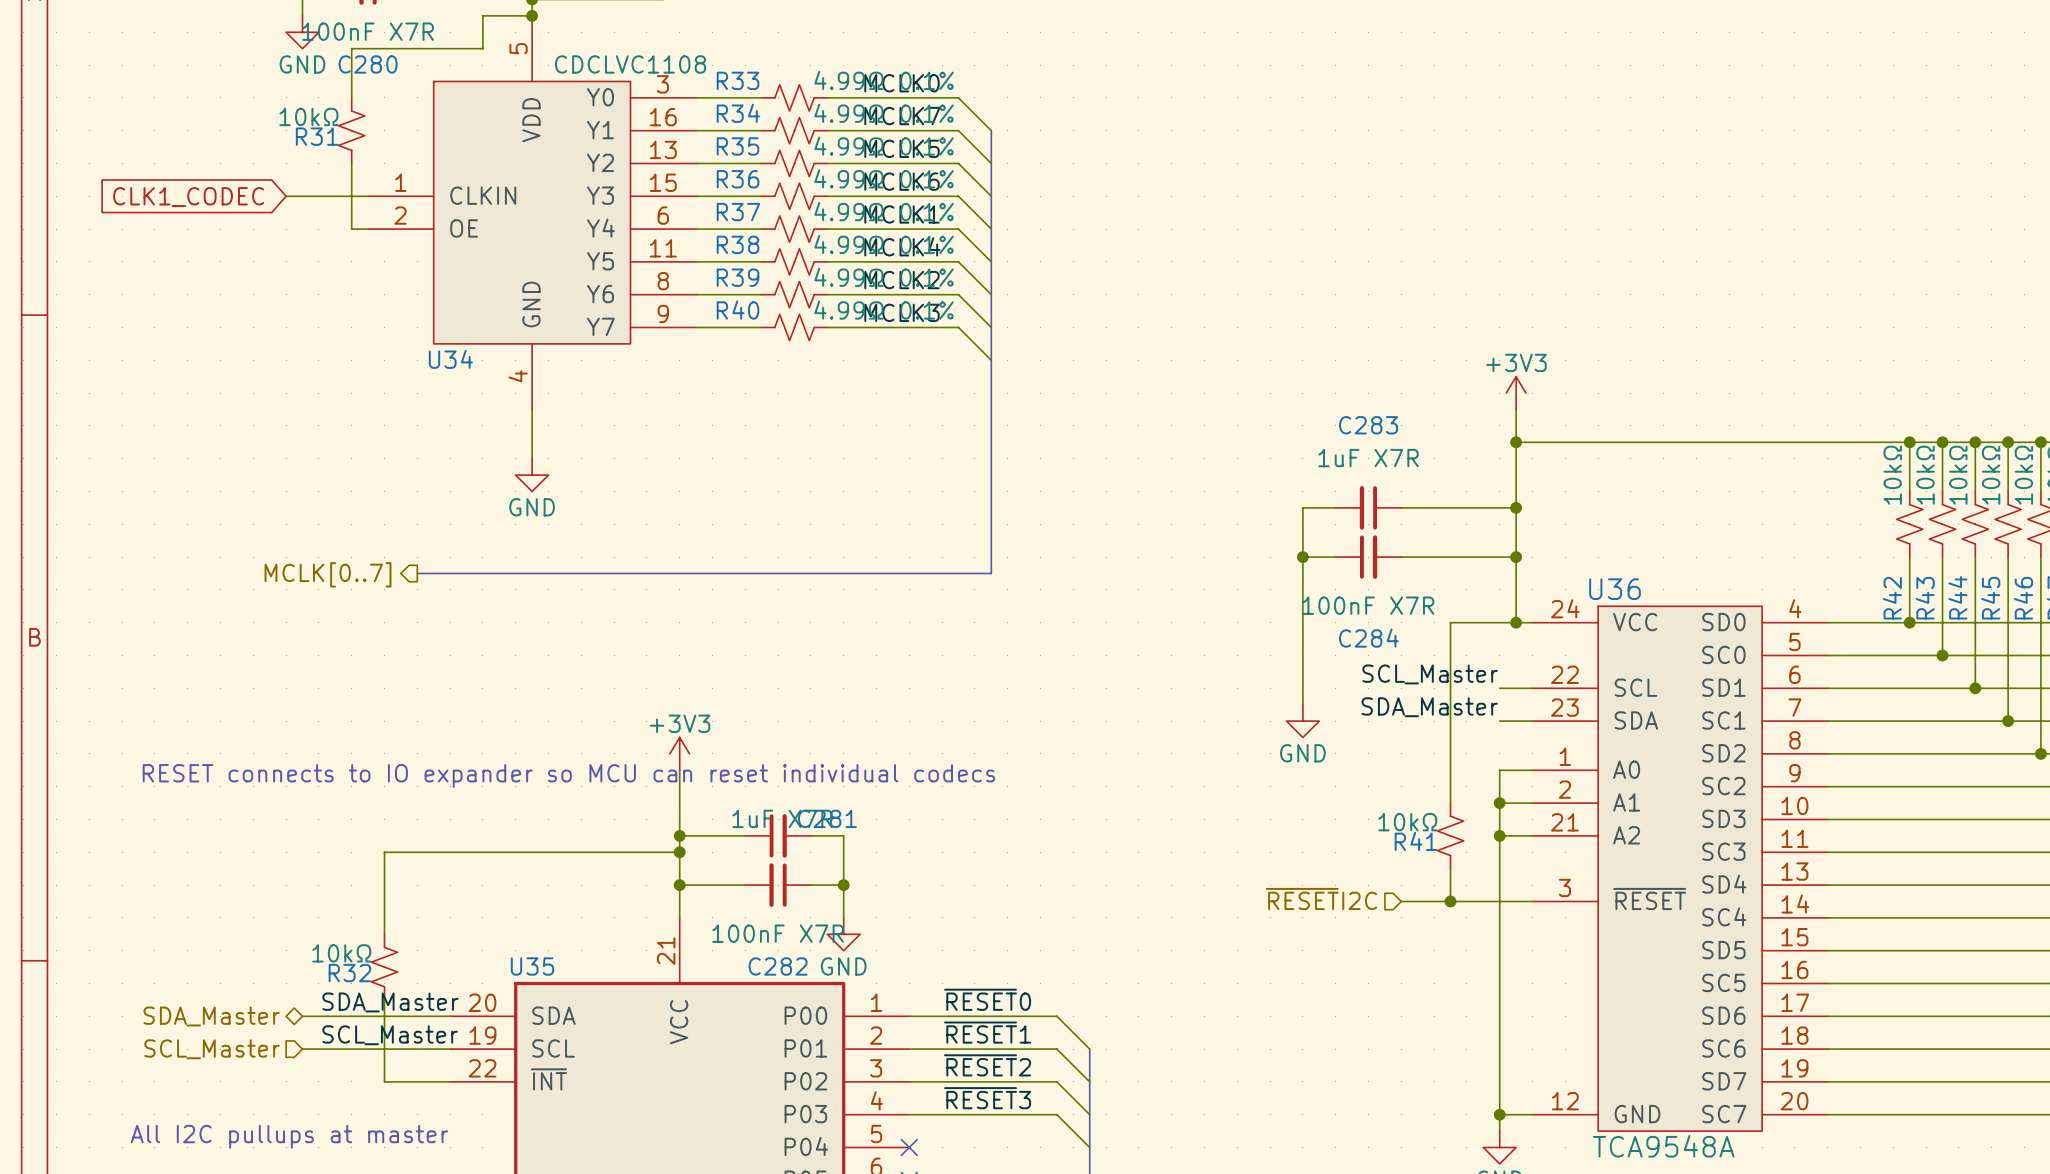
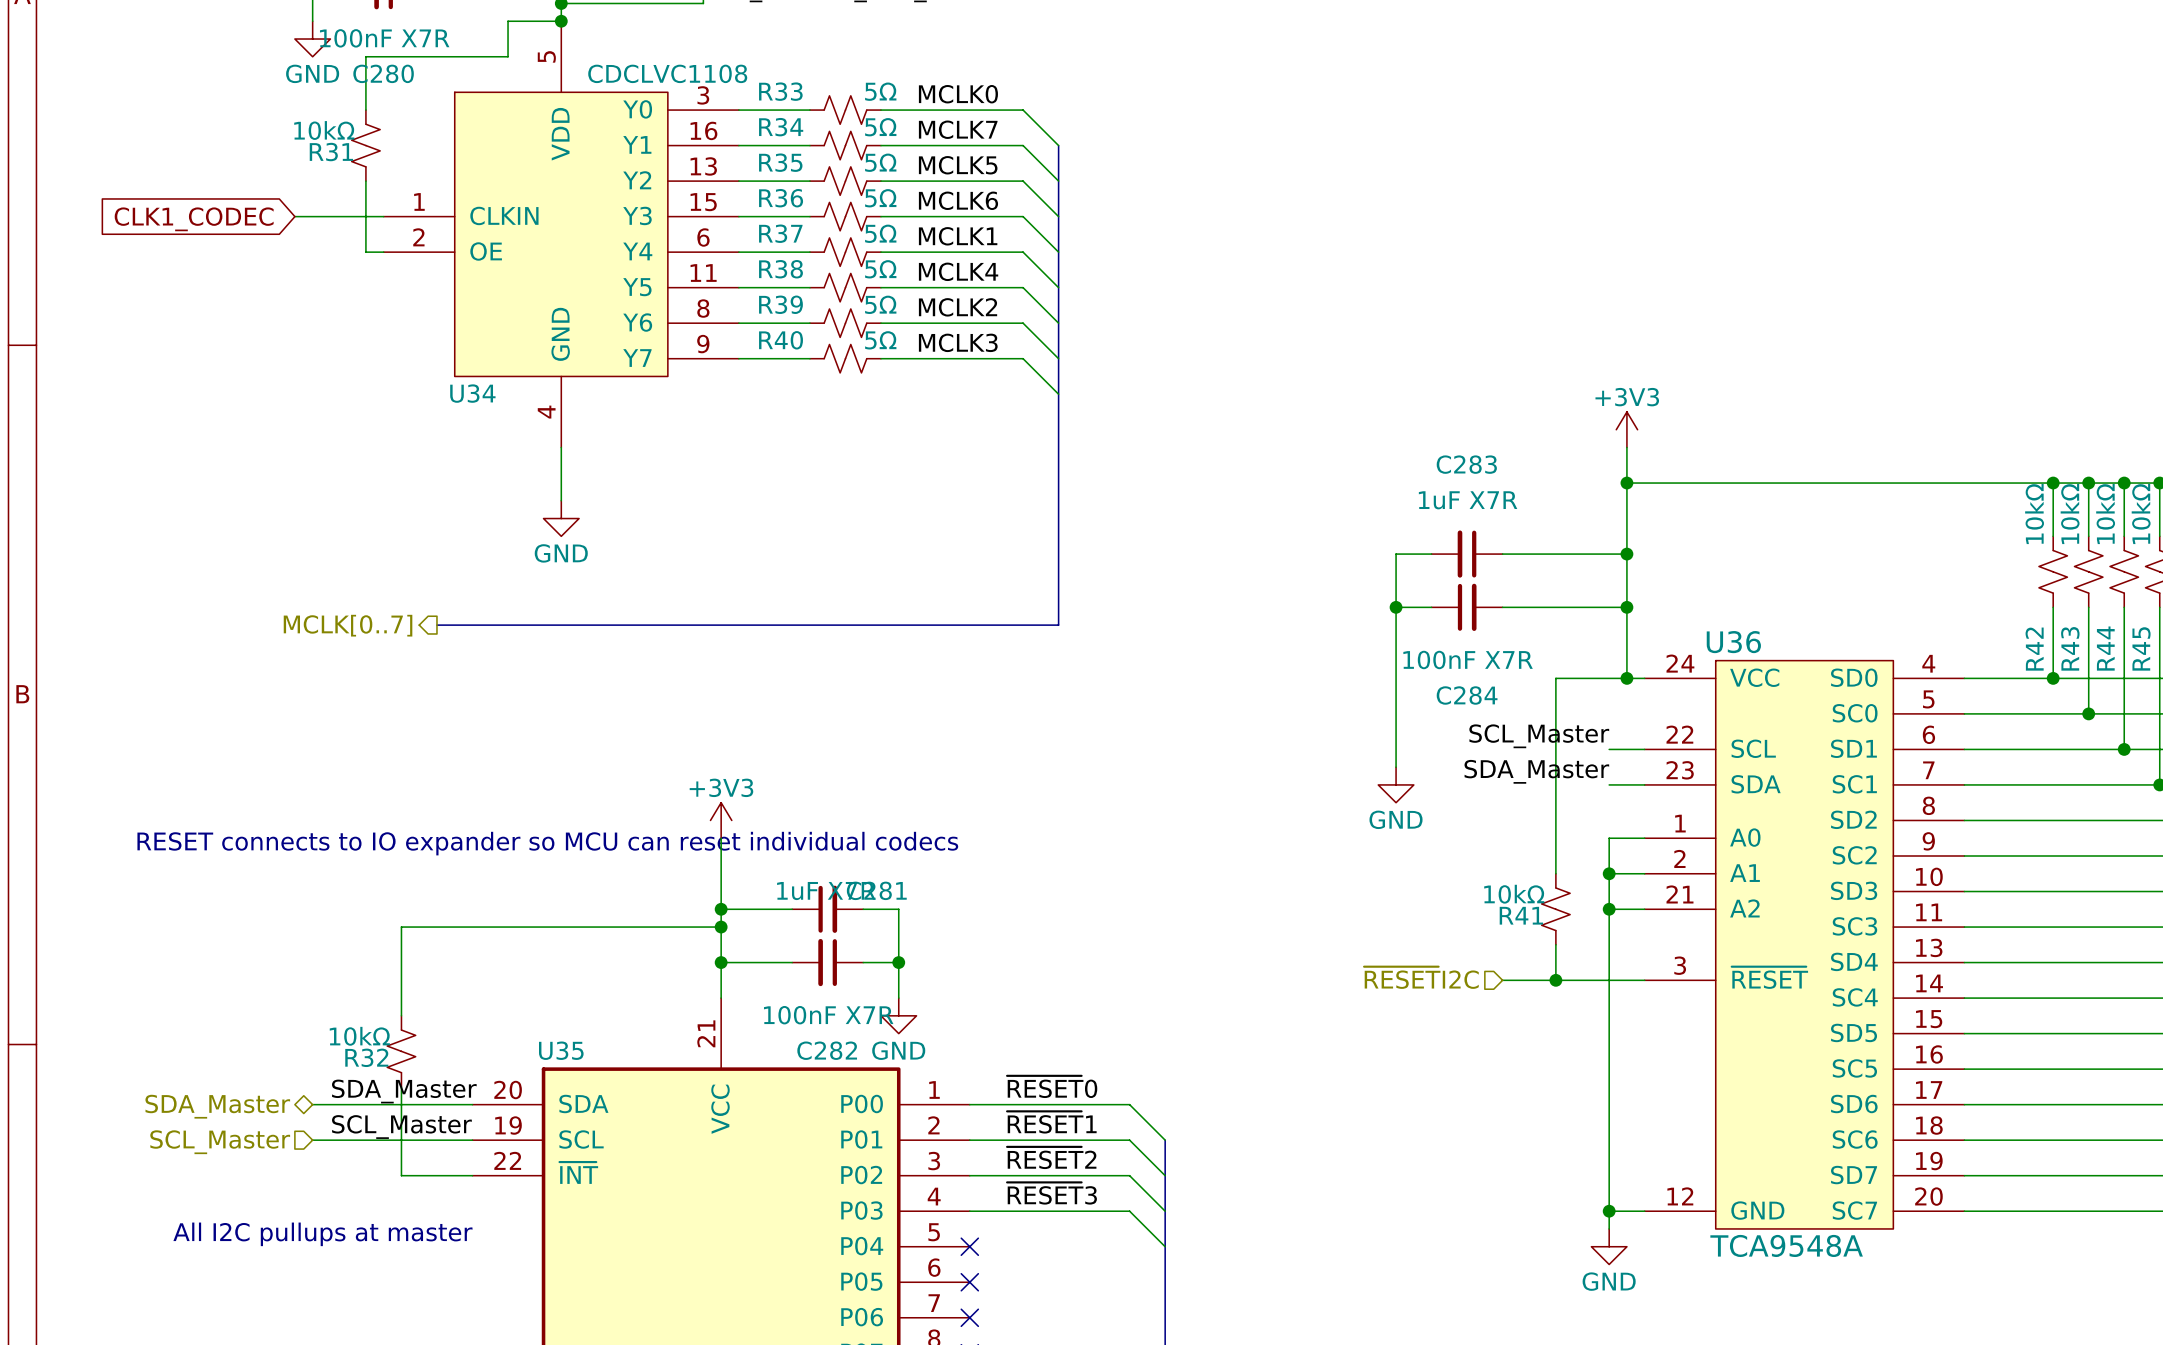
R33 value: 4.99Ω 0.1% (884, 80) -> 5Ω (880, 91)
R34 value: 4.99Ω 0.1% (884, 113) -> 5Ω (880, 127)
R35 value: 4.99Ω 0.1% (884, 146) -> 5Ω (880, 162)
R36 value: 4.99Ω 0.1% (884, 178) -> 5Ω (880, 198)
R37 value: 4.99Ω 0.1% (884, 211) -> 5Ω (880, 233)
R38 value: 4.99Ω 0.1% (884, 244) -> 5Ω (880, 269)
R39 value: 4.99Ω 0.1% (884, 277) -> 5Ω (880, 304)
R40 value: 4.99Ω 0.1% (884, 310) -> 5Ω (880, 340)

